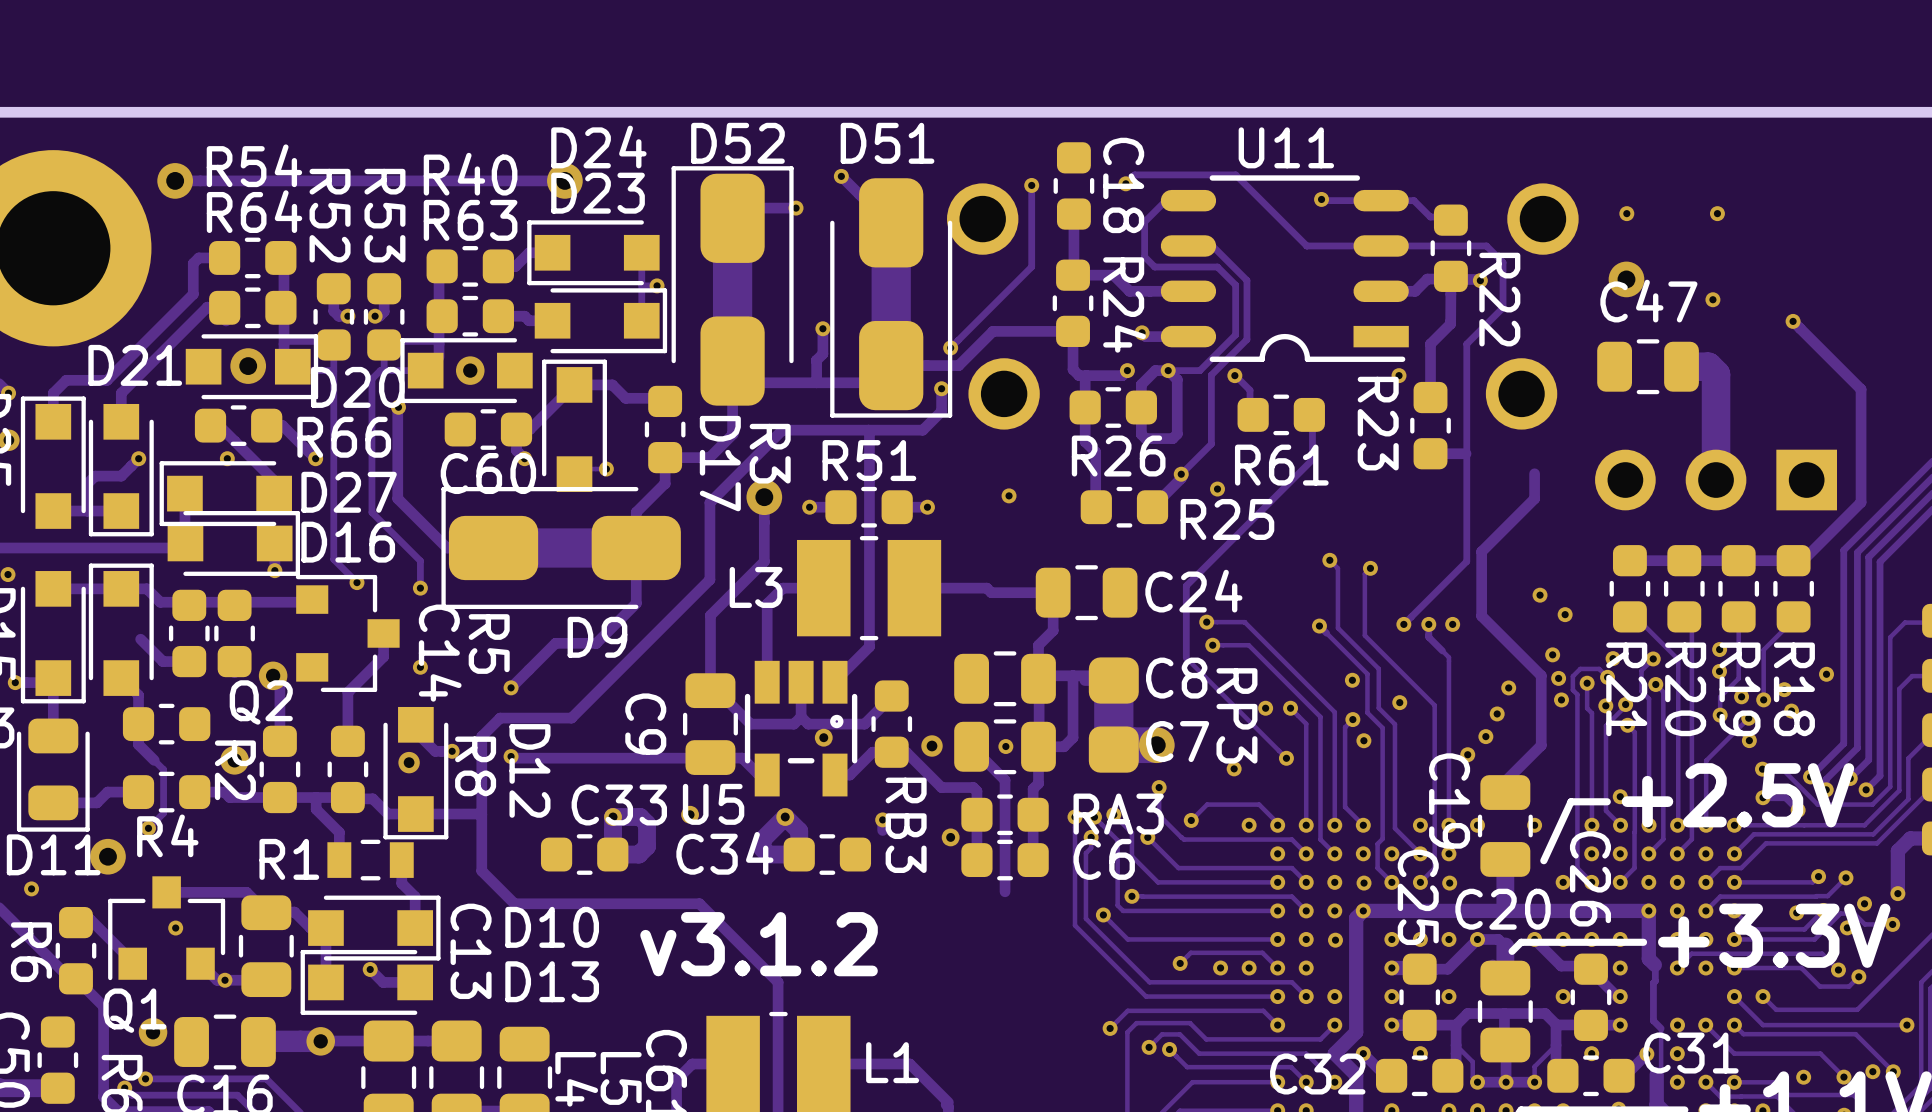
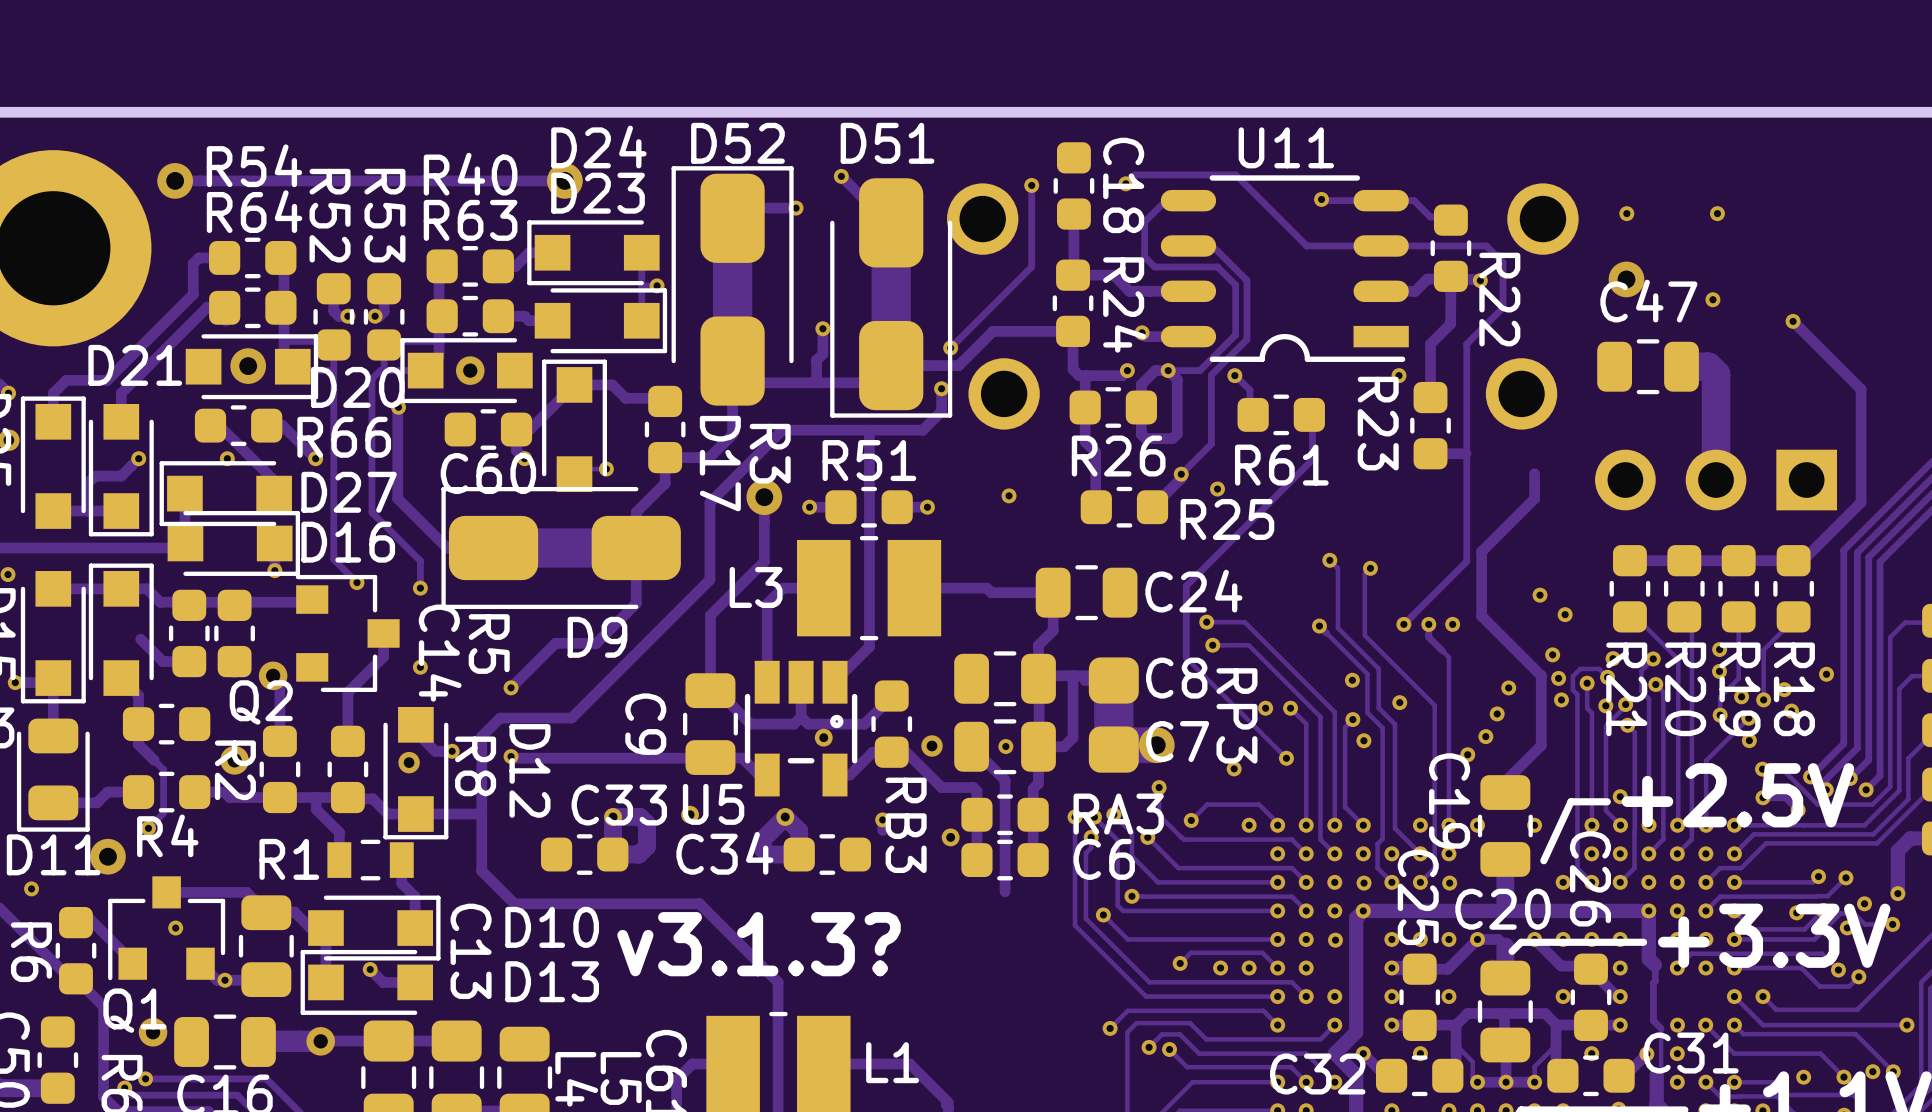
text: v3.1.2 (759, 944) -> v3.1.3? (759, 944)

